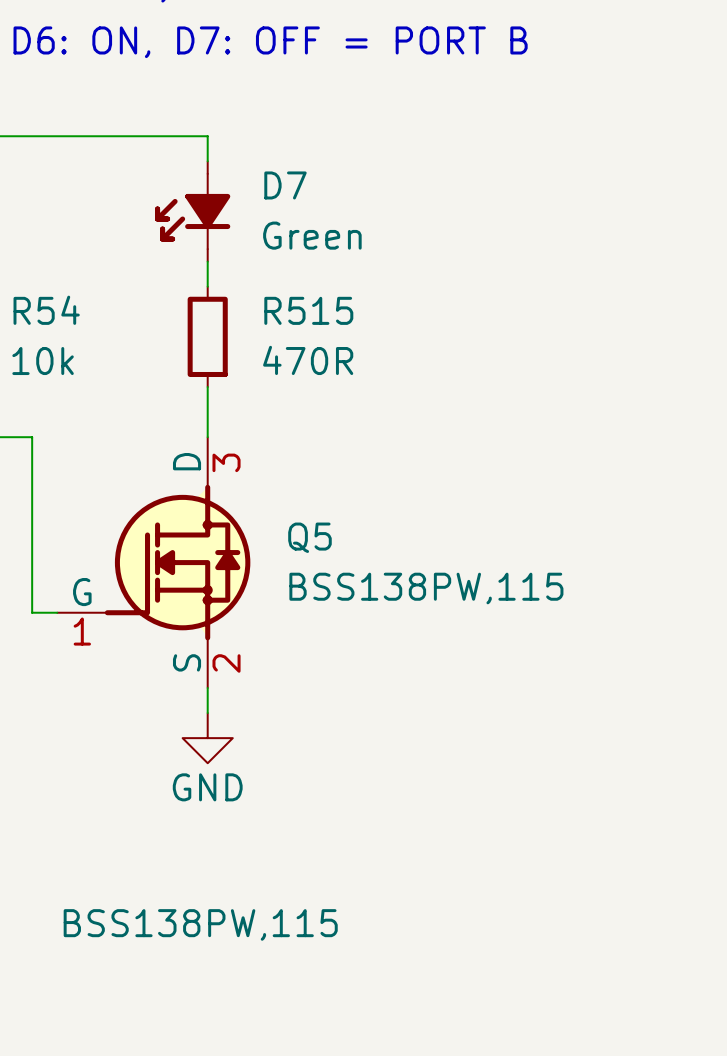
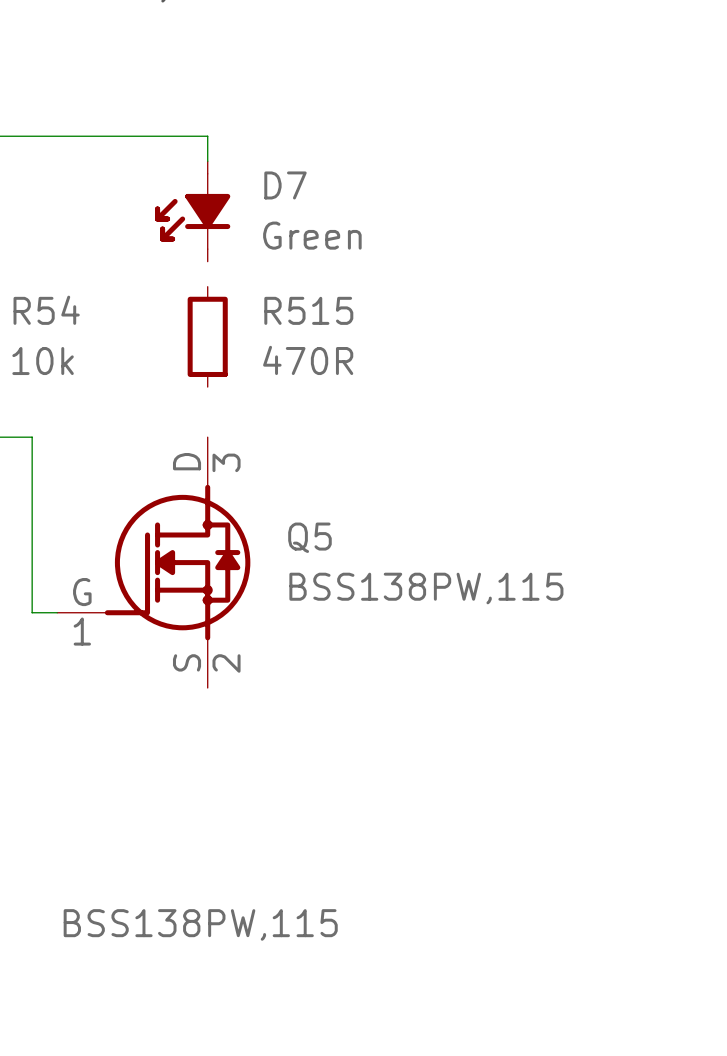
text: D6: ON, D7: OFF = PORT B (270, 42) -> none
wire: (207, 261) (207, 286) -> none
wire: (207, 387) (207, 437) -> none
wire: (207, 687) (207, 713) -> none
power symbol: GND (207, 738) -> none

